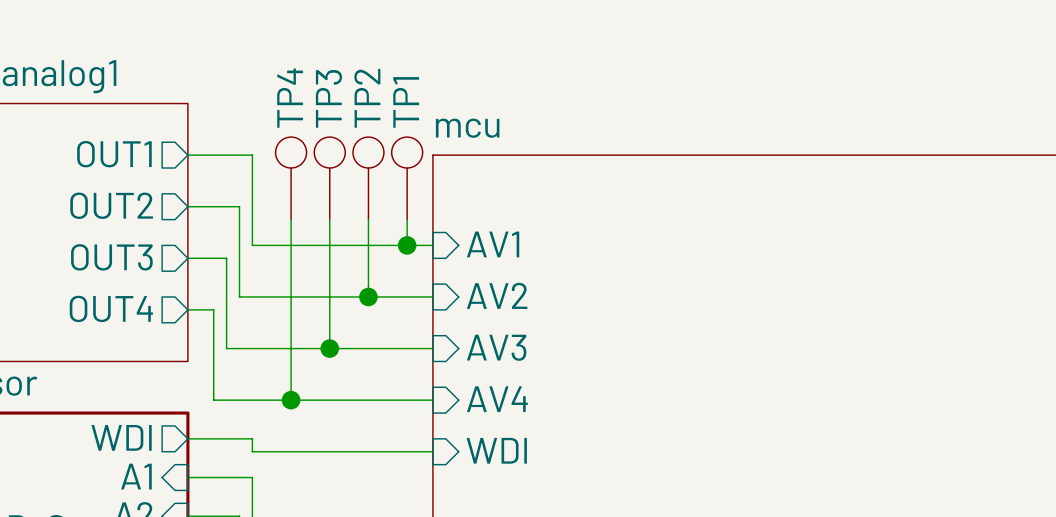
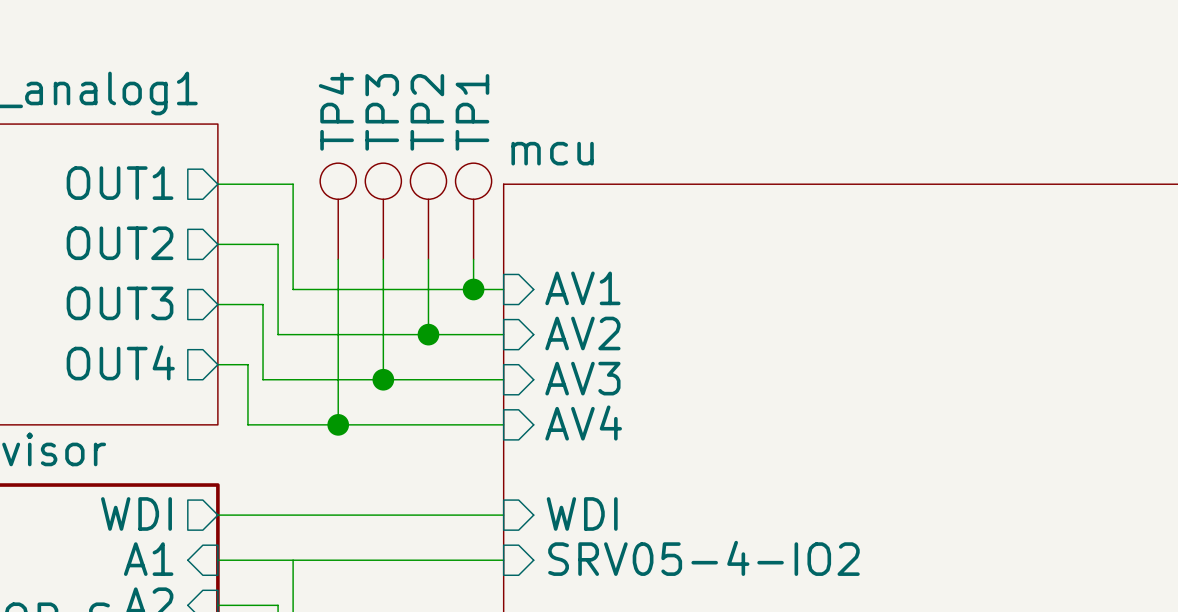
wire: (239, 284) (239, 296) (432, 296) -> (278, 334) (503, 334)
sheet pin position: AV2 (497, 295) -> AV2 (582, 333)
junction position: (368, 296) -> (428, 334)
wire: (226, 322) (226, 348) (432, 348) -> (263, 379) (503, 379)
wire: (329, 322) (329, 348) -> none
junction: none -> (383, 379)
sheet pin position: AV3 (496, 347) -> AV3 (582, 378)
junction: (329, 348) -> none
wire: (213, 361) (213, 400) (432, 400) -> (247, 424) (503, 424)
wire: (291, 361) (291, 400) -> none
junction: none -> (338, 424)
sheet pin position: AV4 (497, 399) -> AV4 (583, 423)
junction: (291, 400) -> none
wire: (252, 438) (252, 451) (432, 451) -> (293, 515) (503, 515)
sheet pin position: WDI (496, 450) -> WDI (582, 513)
sheet pin: none -> SRV05-4-IO2 (703, 558)
wire: none -> (293, 560) (503, 560)

